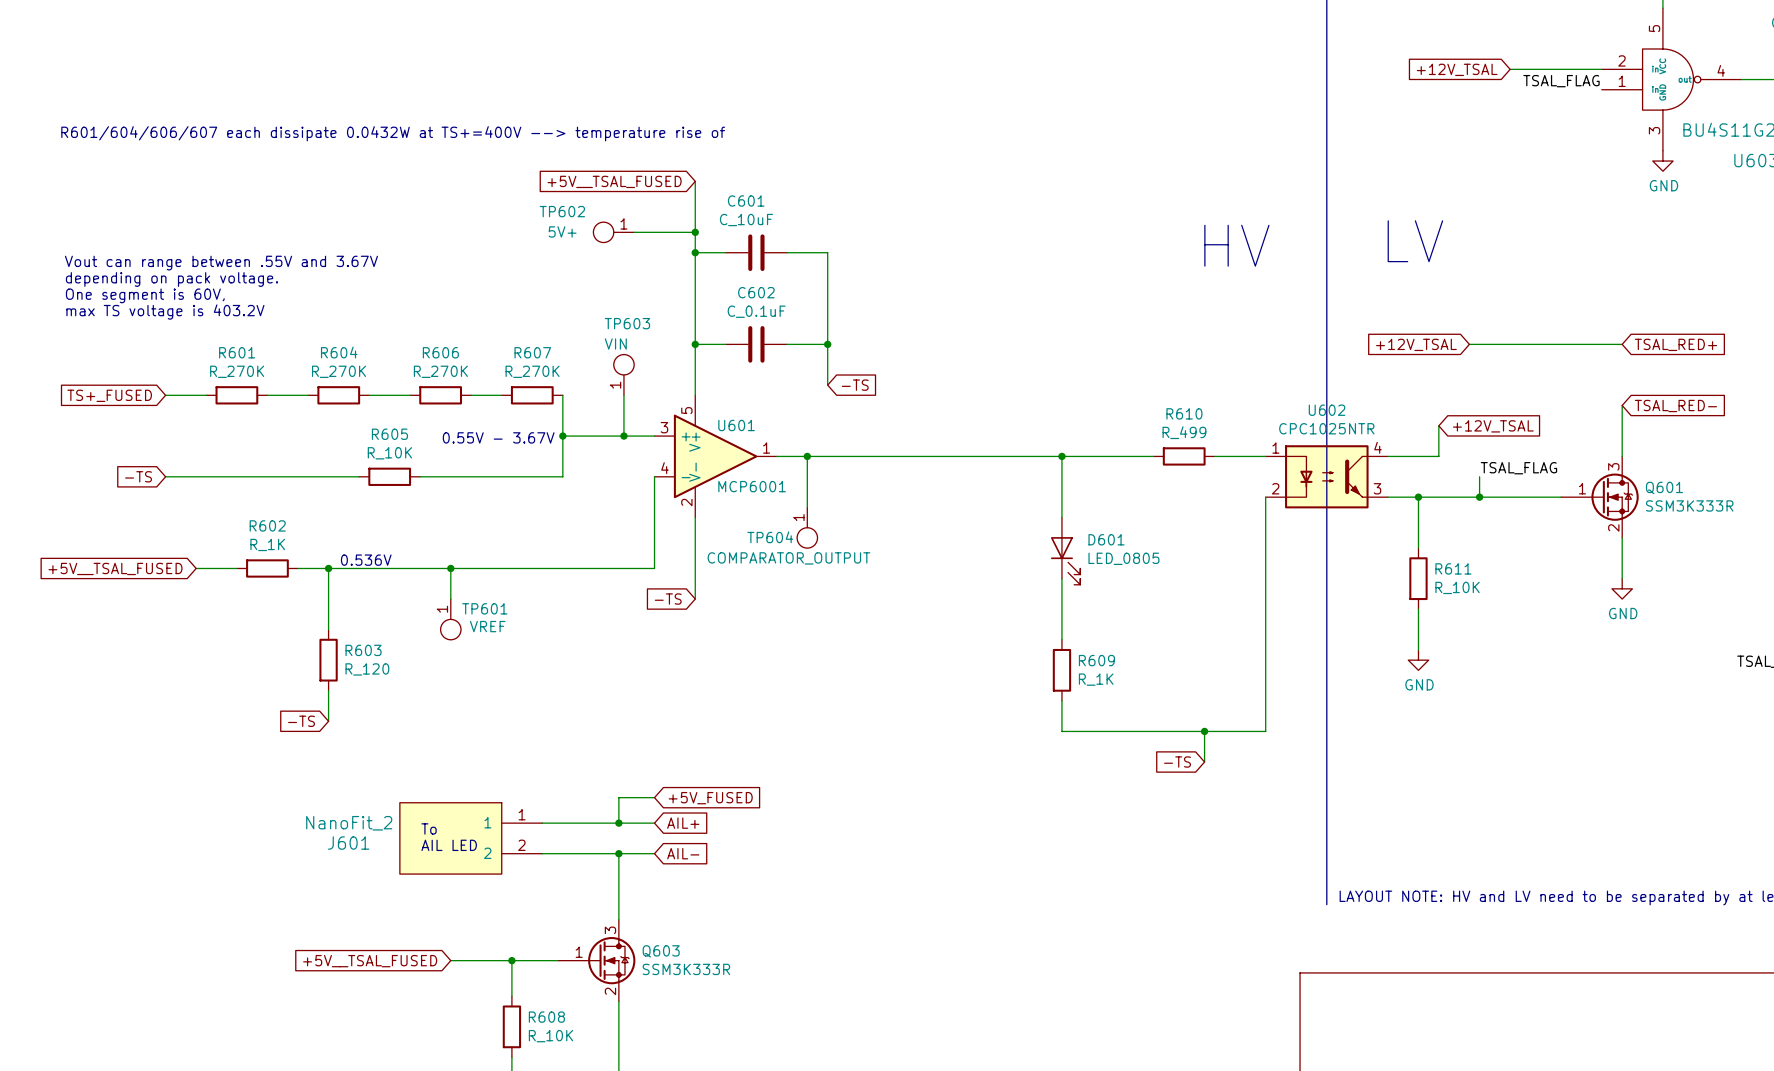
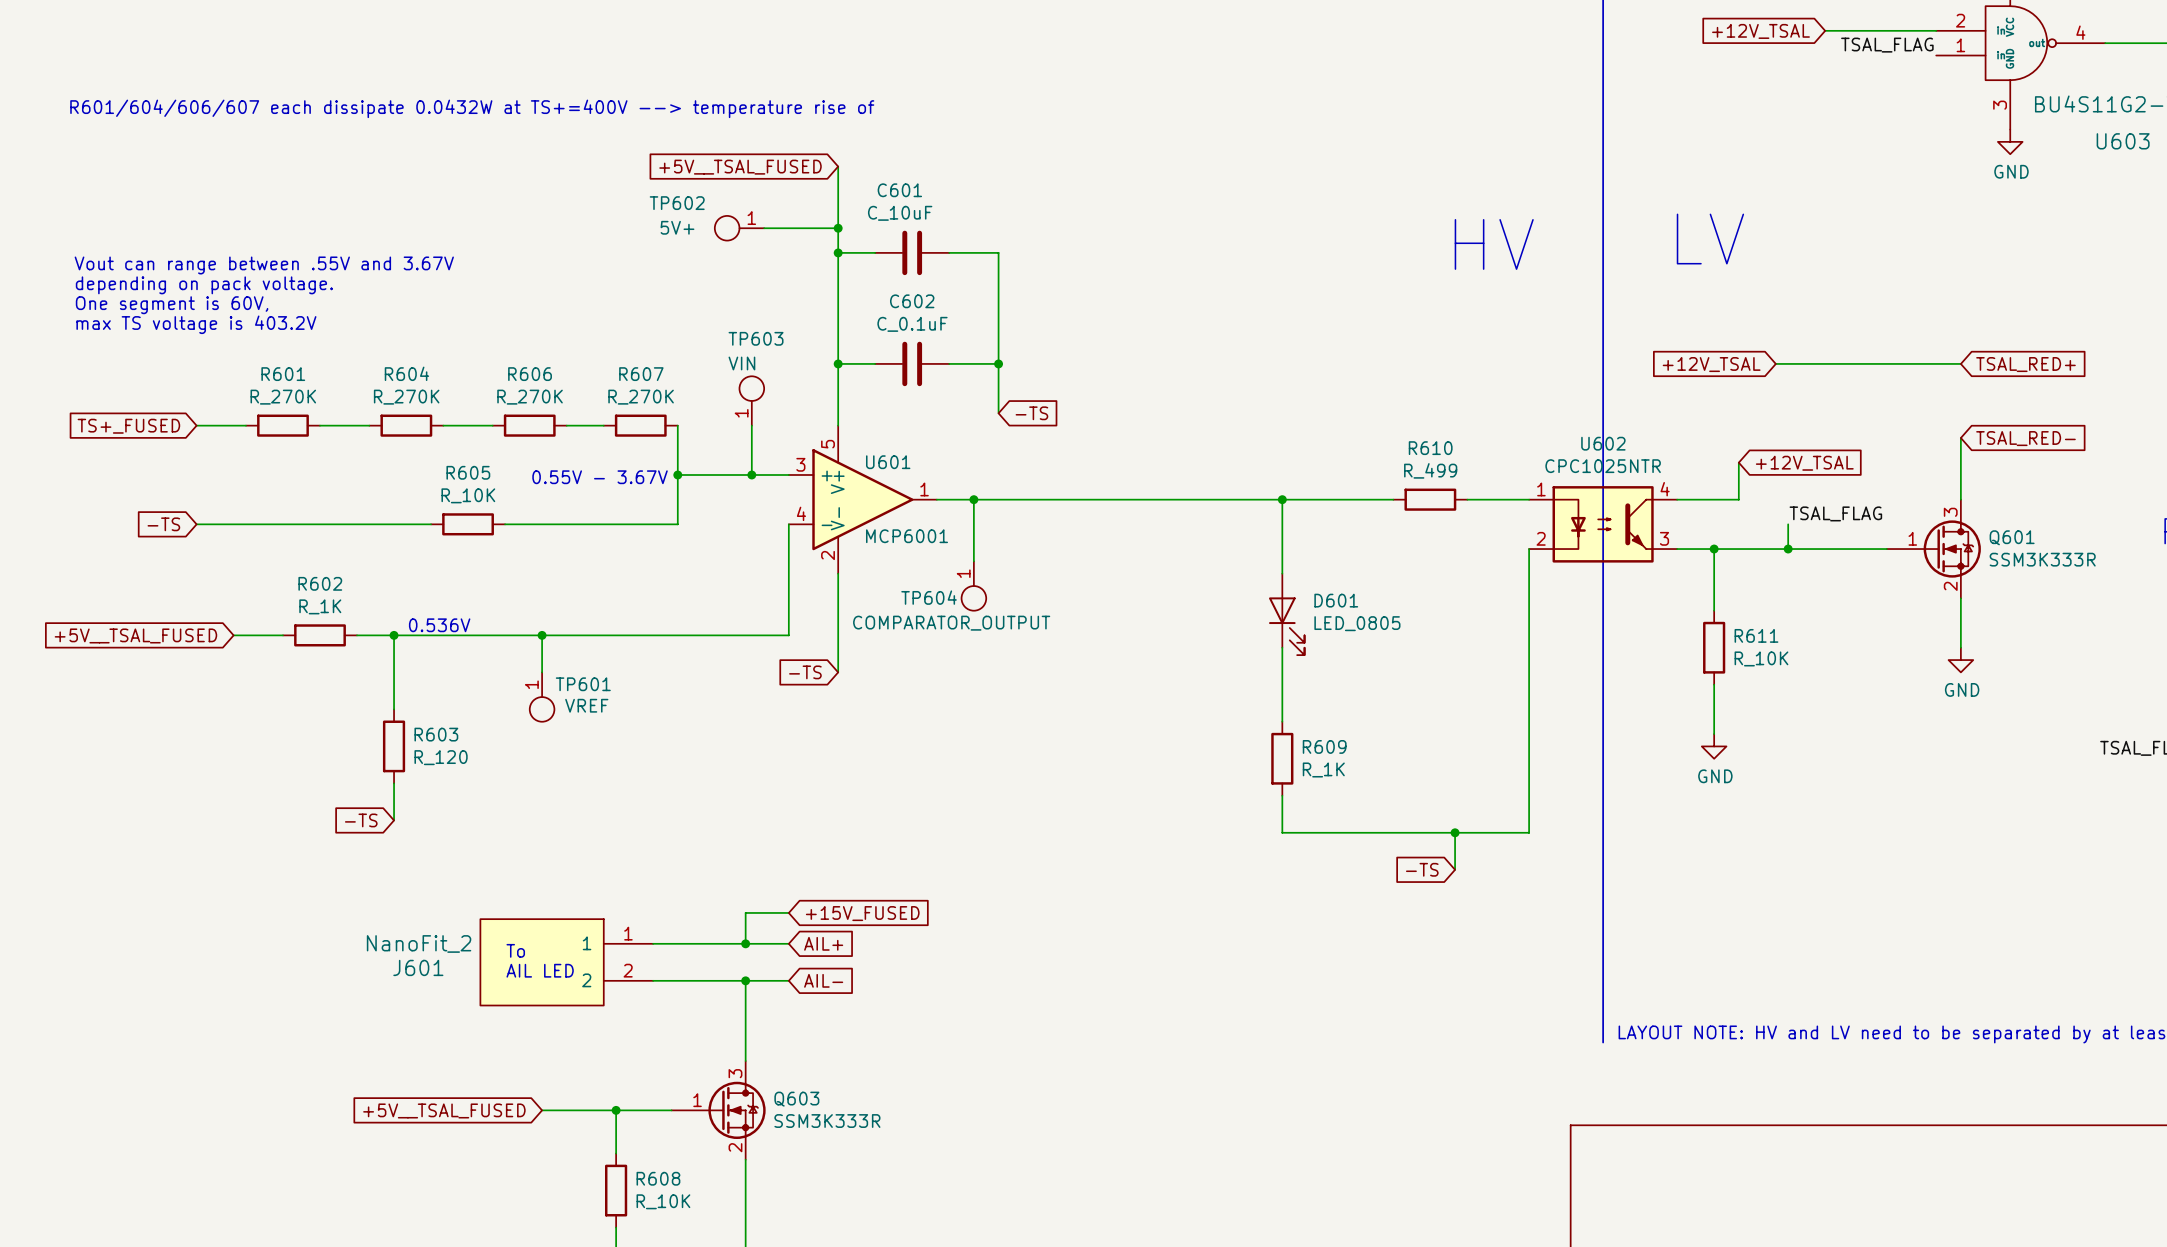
global label: +5V_FUSED (710, 798) -> +15V_FUSED (862, 913)

